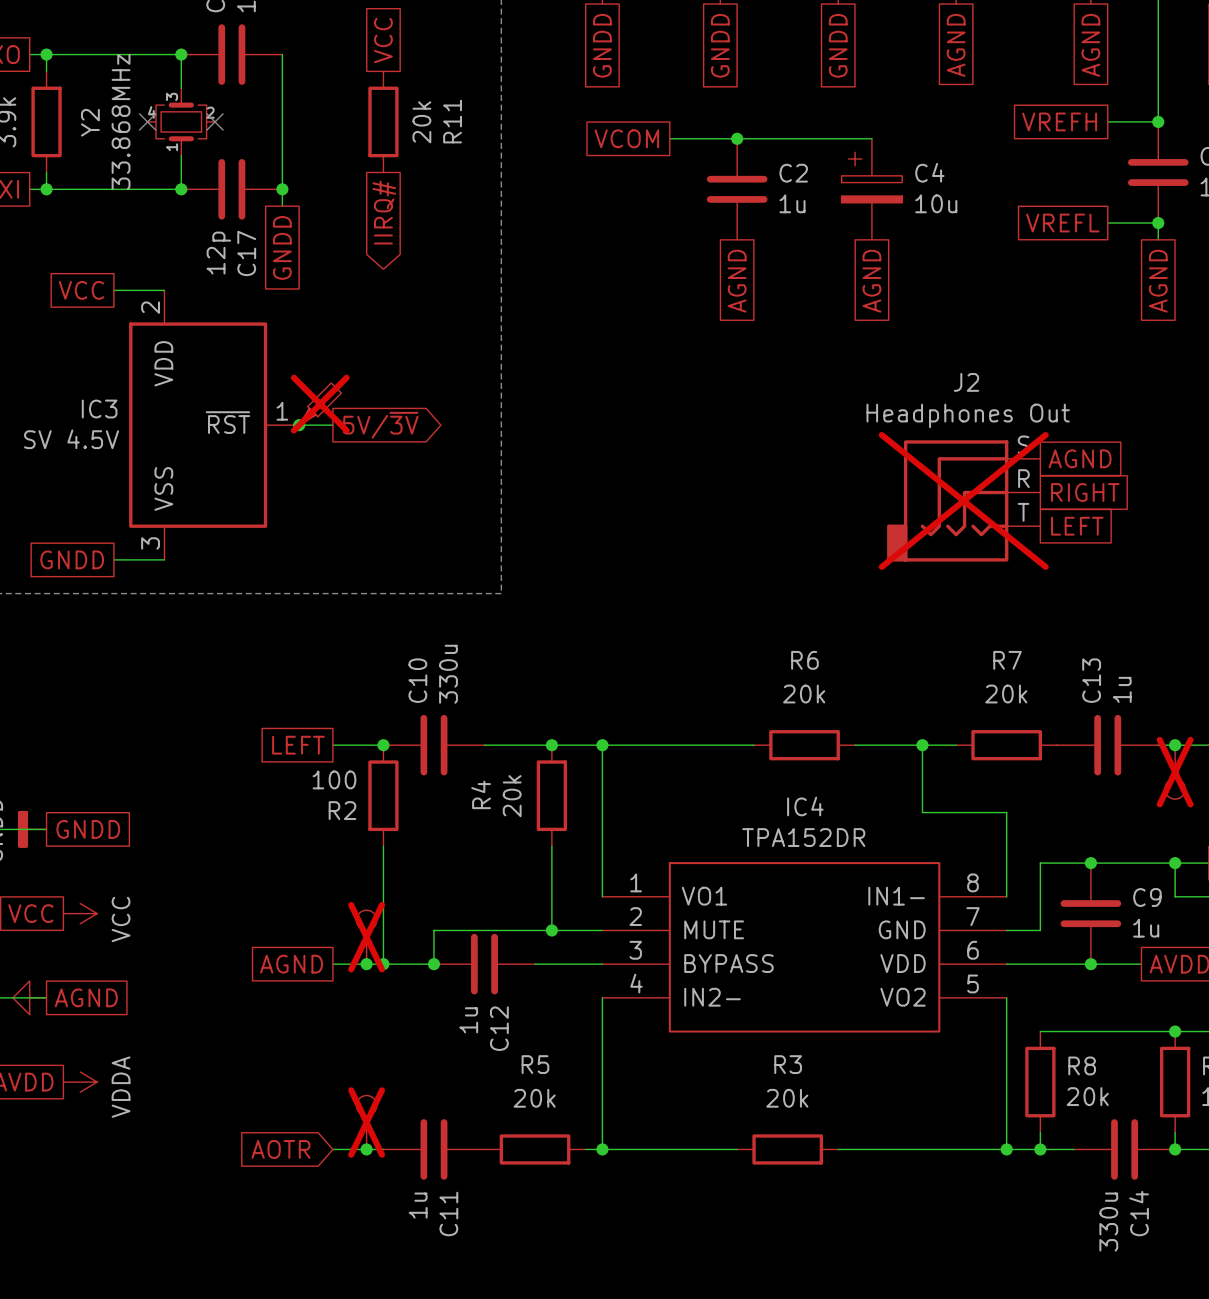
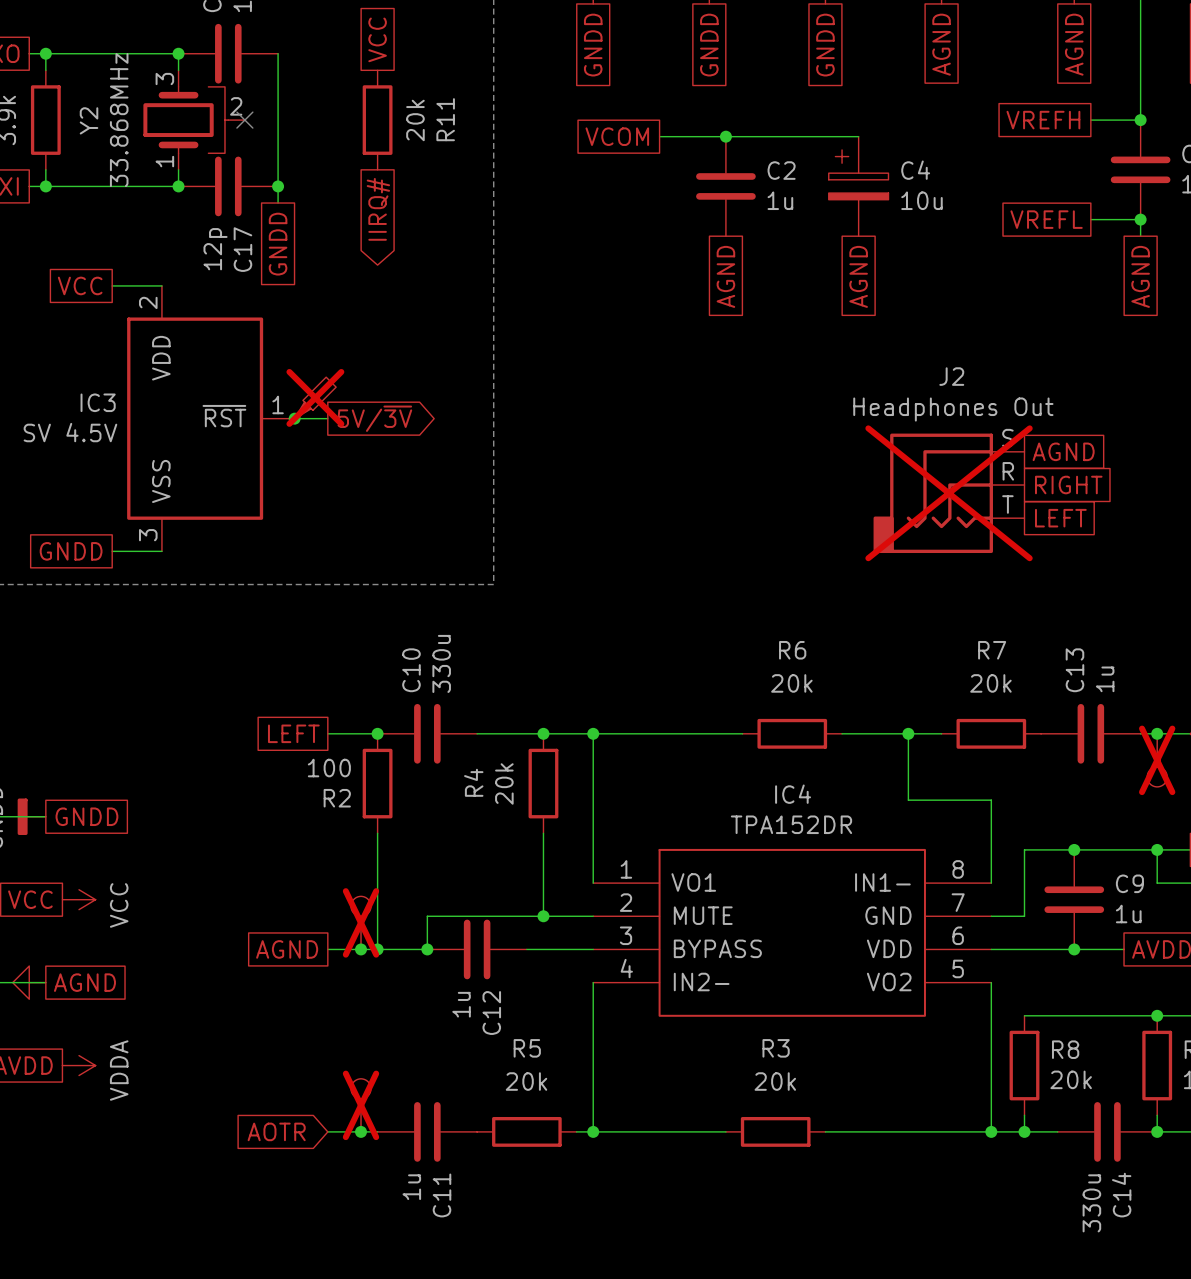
Y2 symbol: [147, 88, 216, 156] -> [143, 70, 245, 170]
no-connect mark: (147, 121) -> none
no-connect mark position: (215, 121) -> (244, 120)

